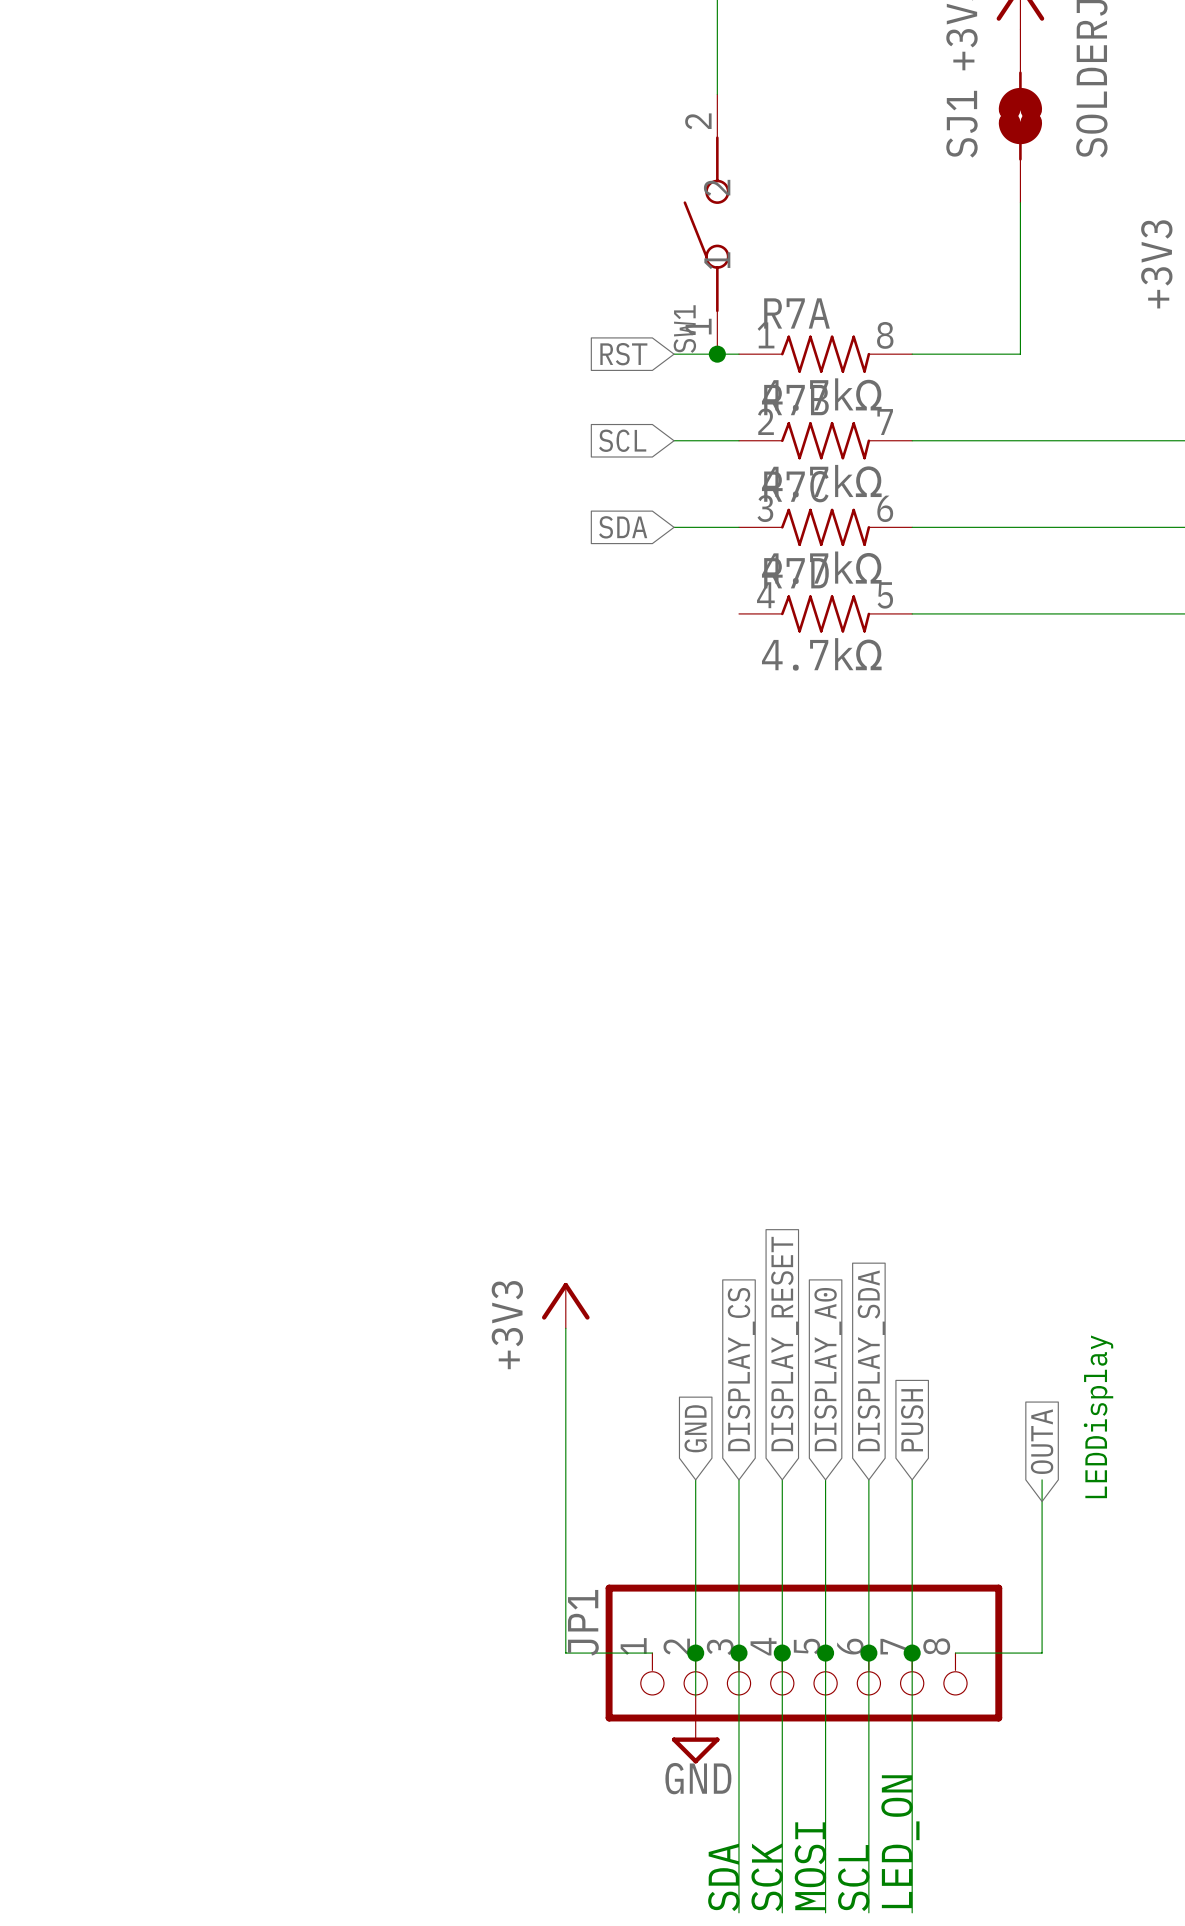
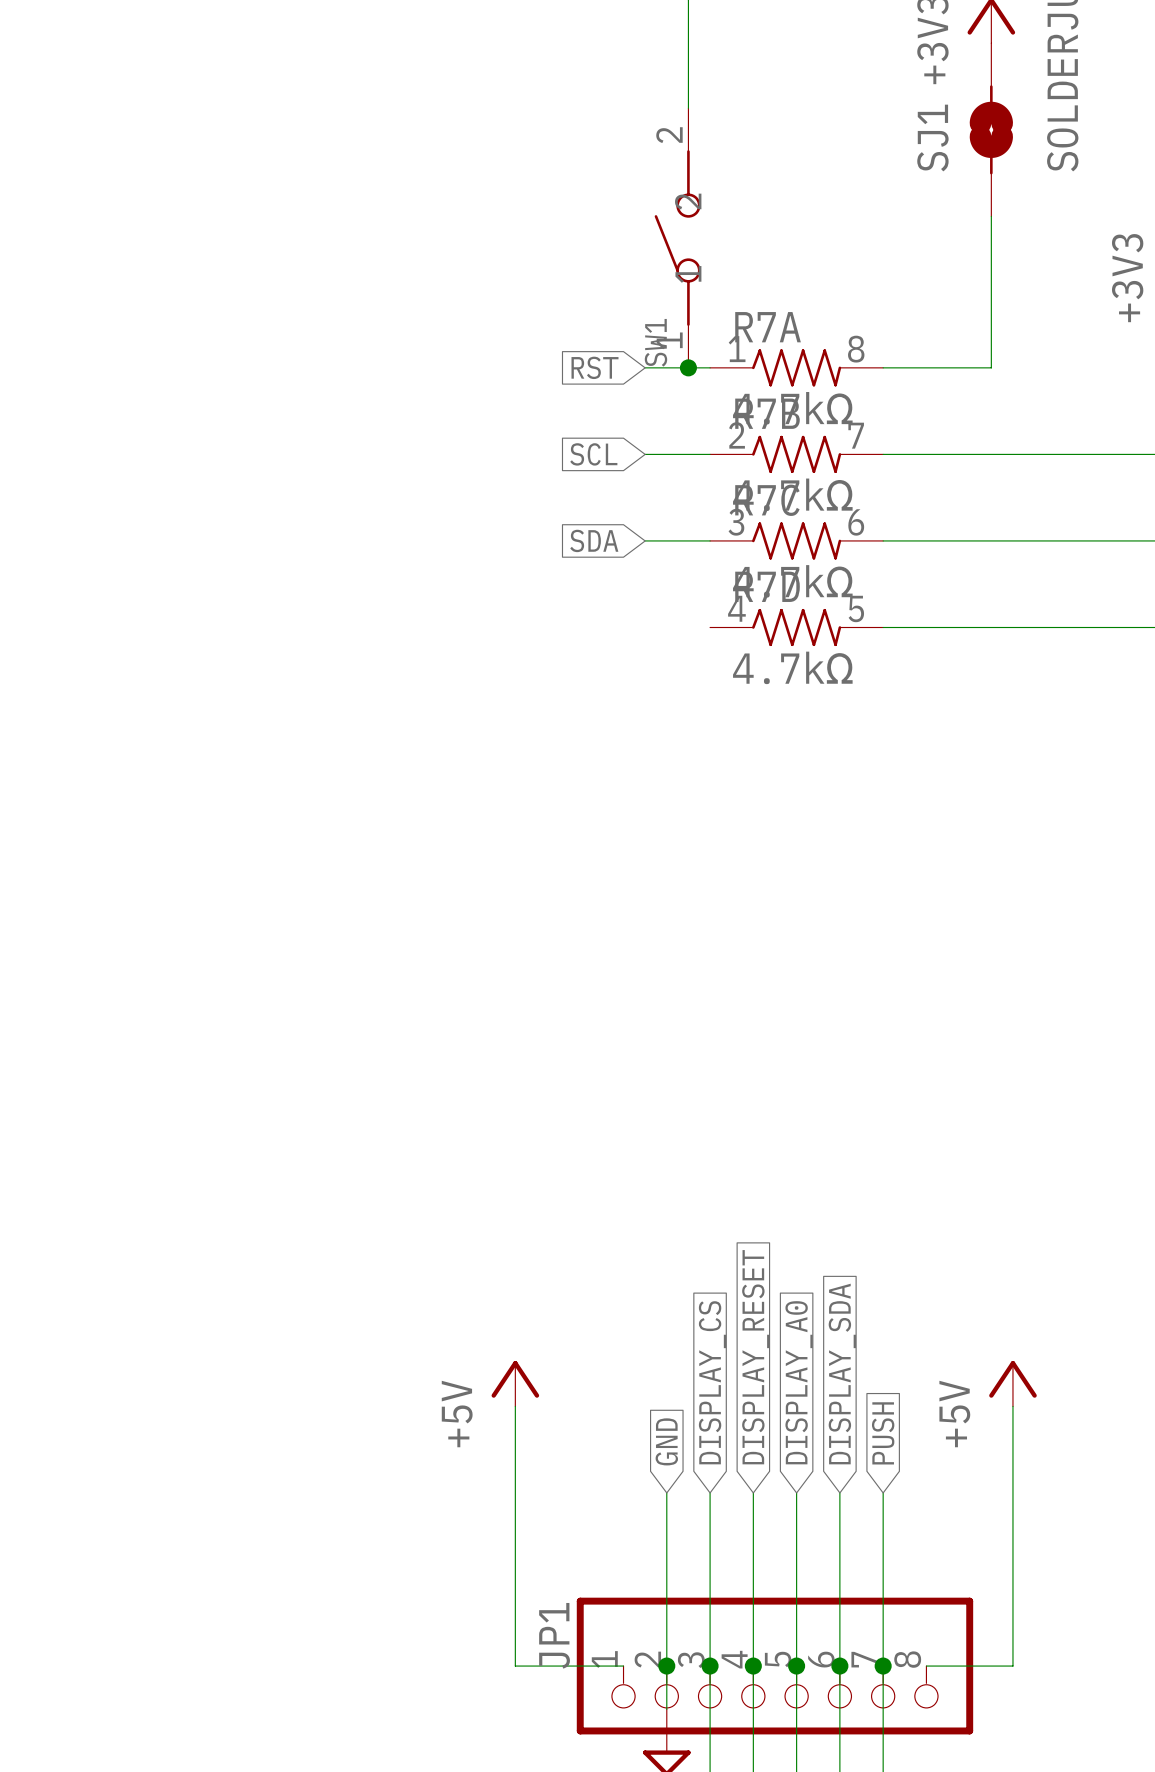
power symbol: +3V3 (565, 1305) -> none
wire: (565, 1328) (565, 1653) -> (515, 1406) (515, 1666) (536, 1666)
power symbol: none -> +5V (515, 1383)
power symbol: none -> +5V (1012, 1383)
wire: none -> (1012, 1406) (1012, 1492)
text: LEDDisplay (1098, 1416) -> none
global label: OUTA (1042, 1441) -> none

